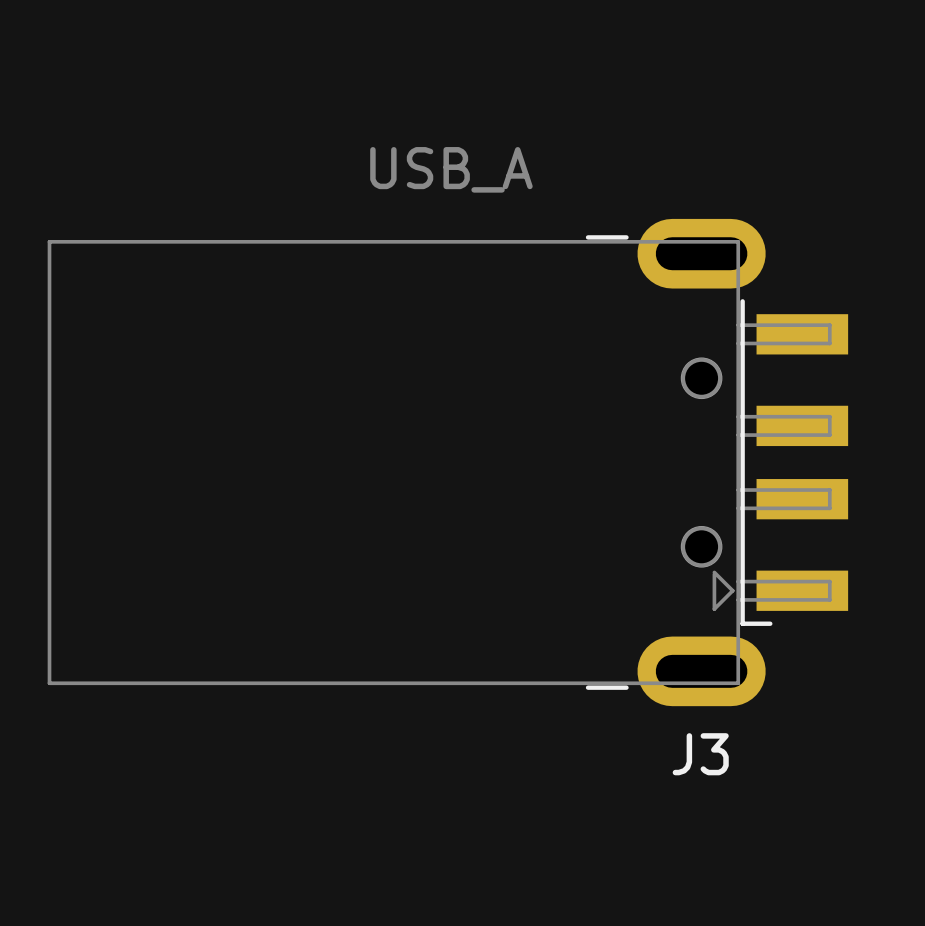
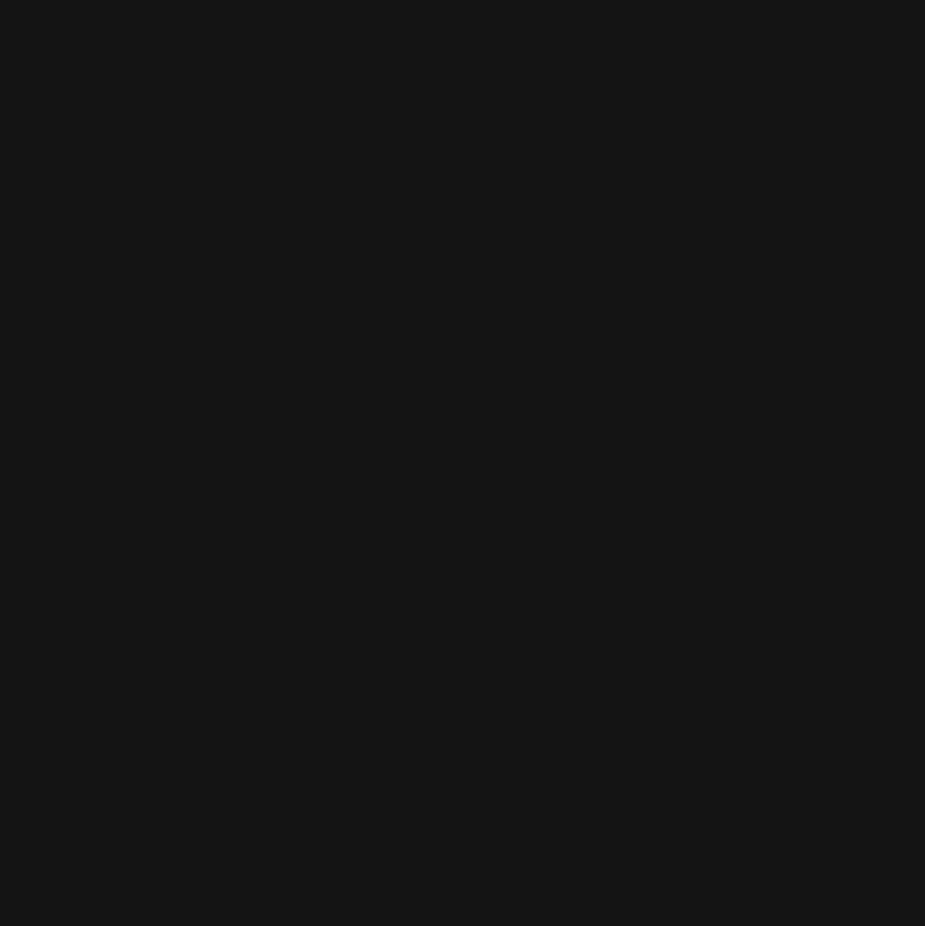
J3: USB_A (447, 462) -> none

